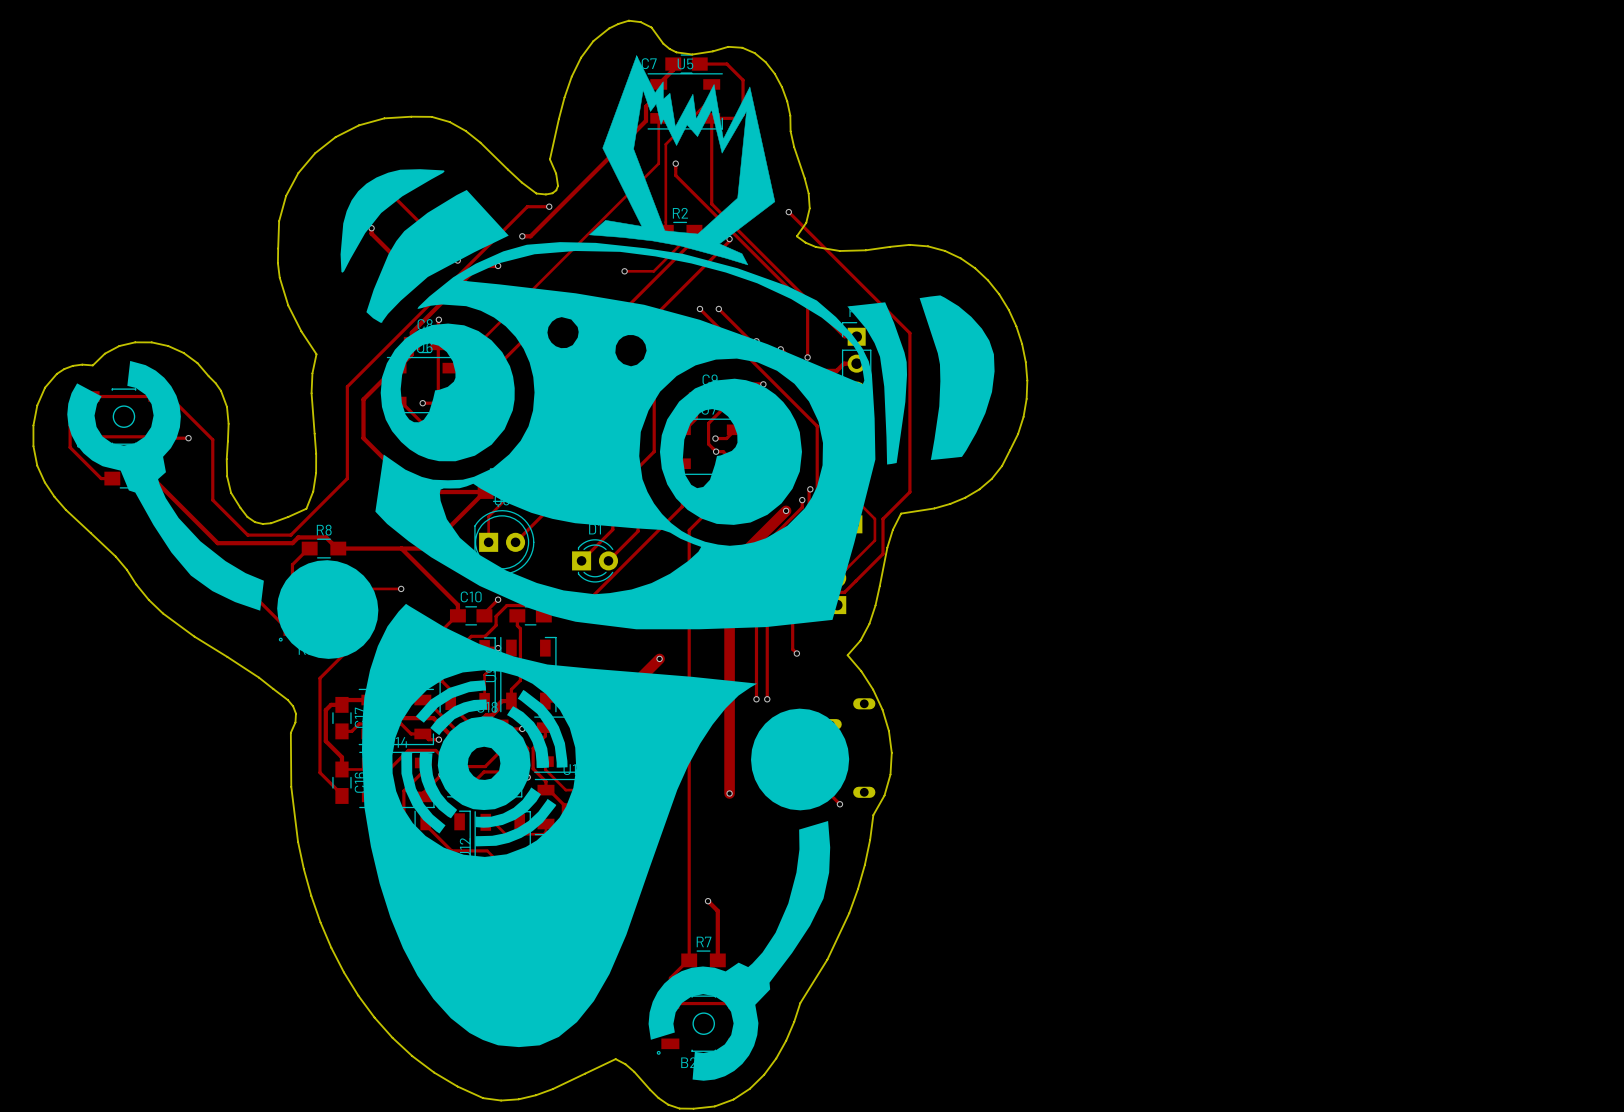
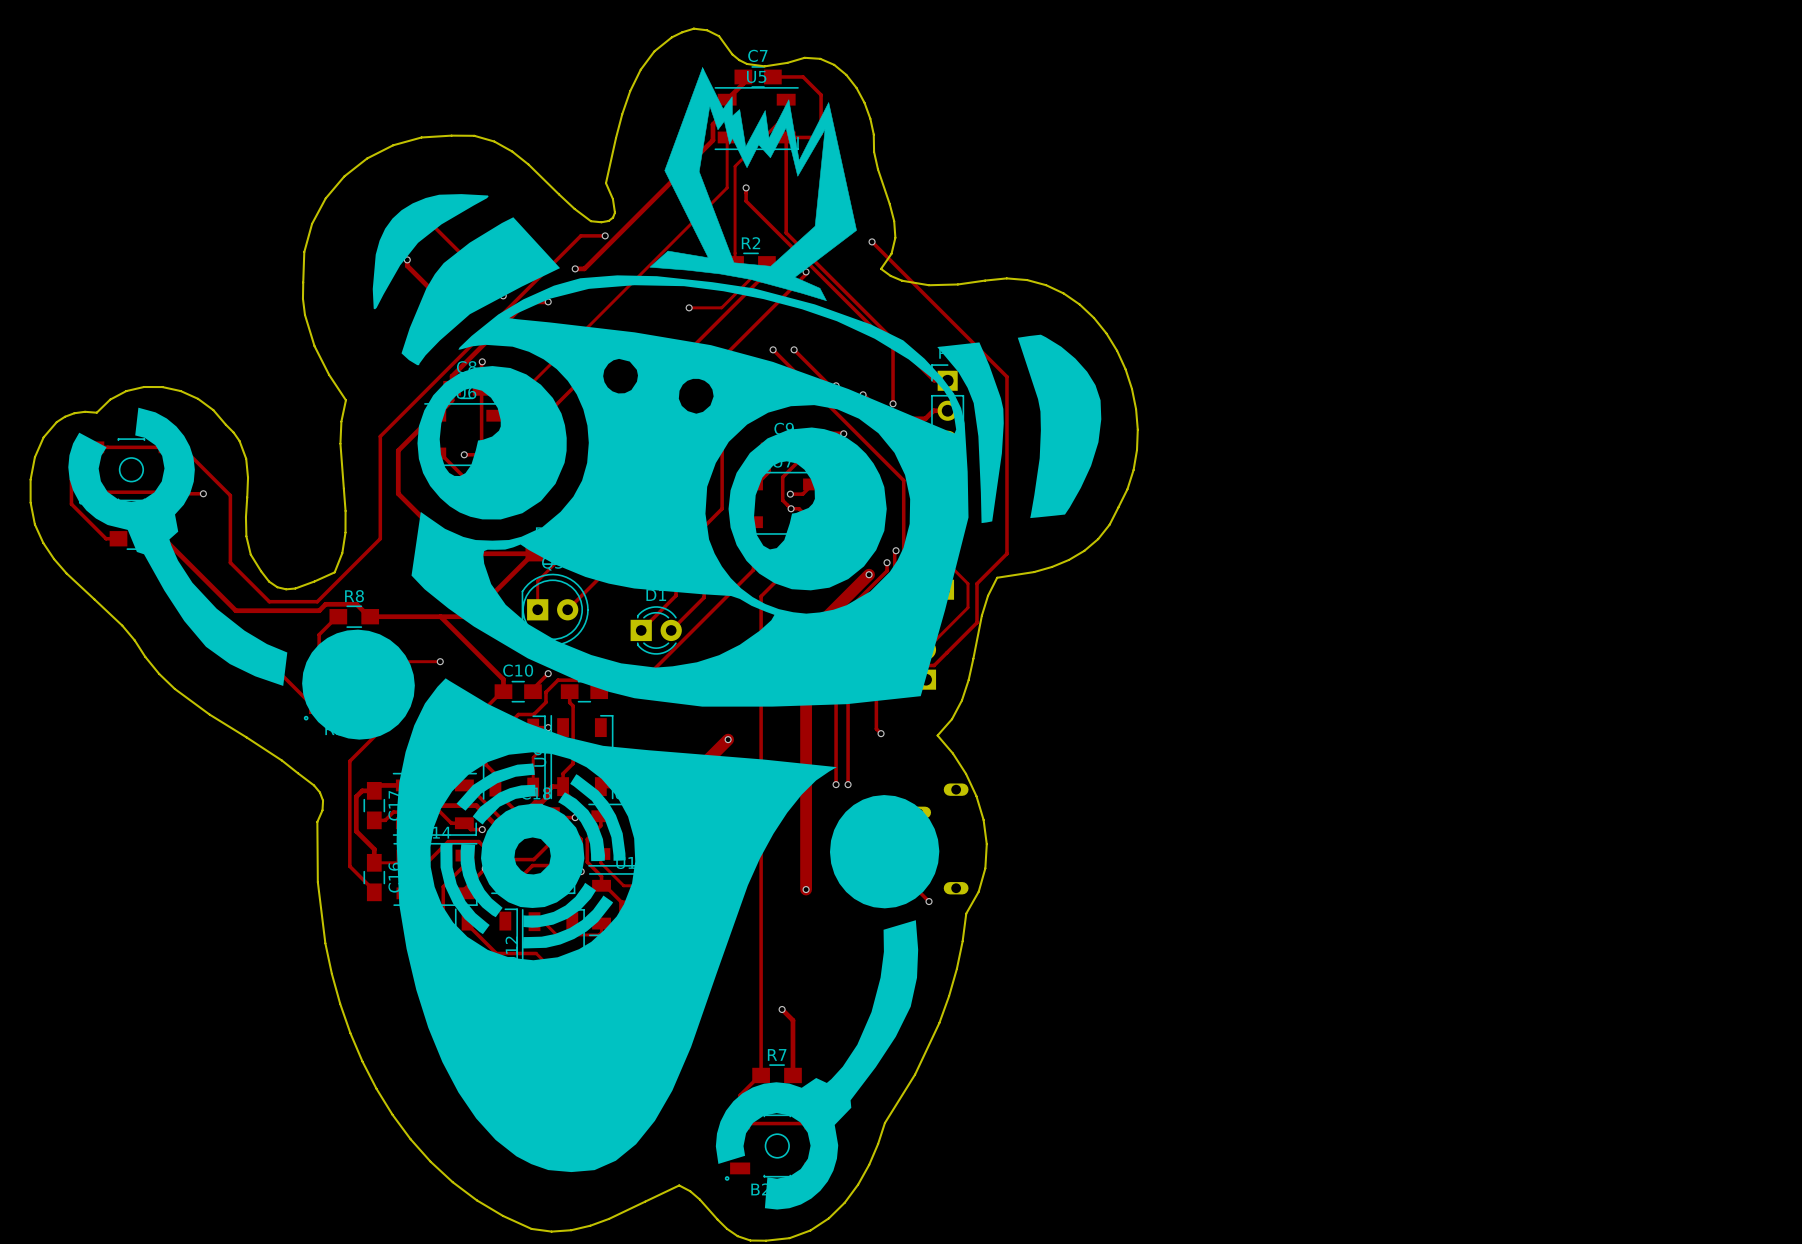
C7 name position: C7 (649, 63) -> C7 (757, 55)

